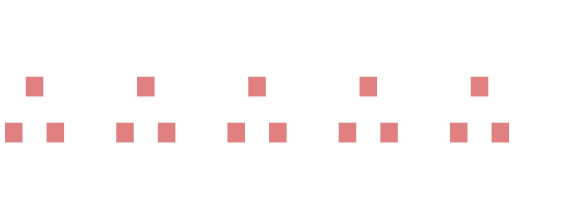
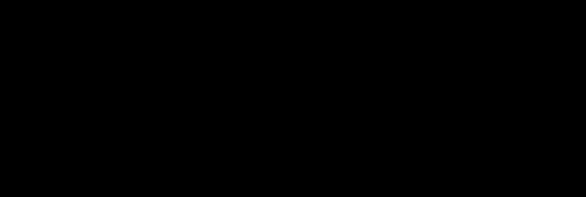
part: (34, 109) -> none
part: (145, 109) -> none
part: (257, 109) -> none
part: (368, 109) -> none
part: (479, 109) -> none

